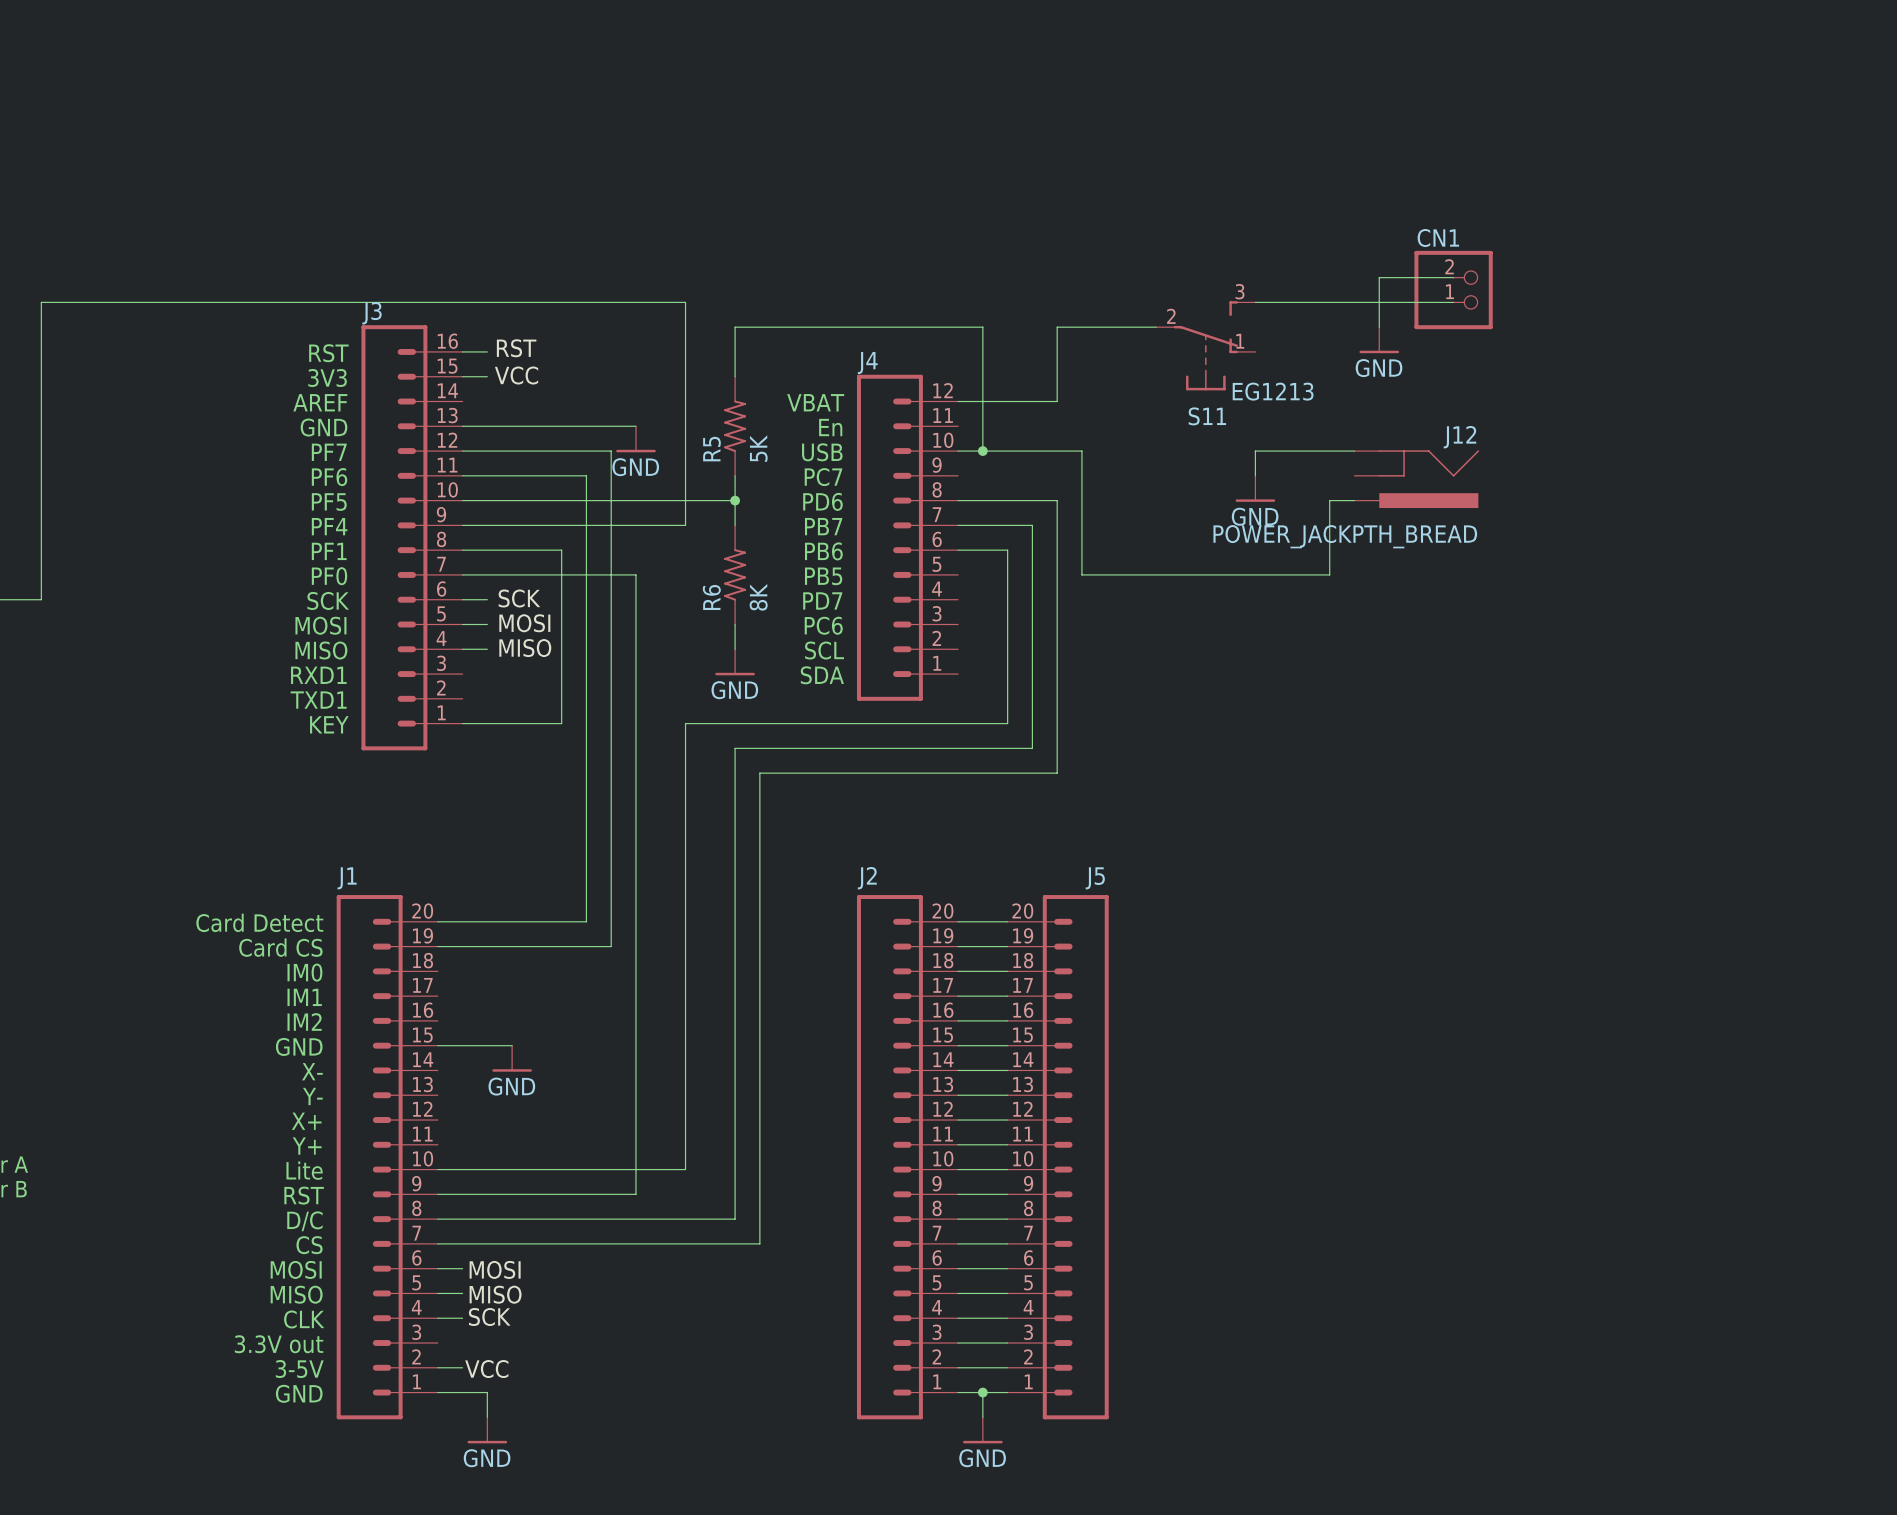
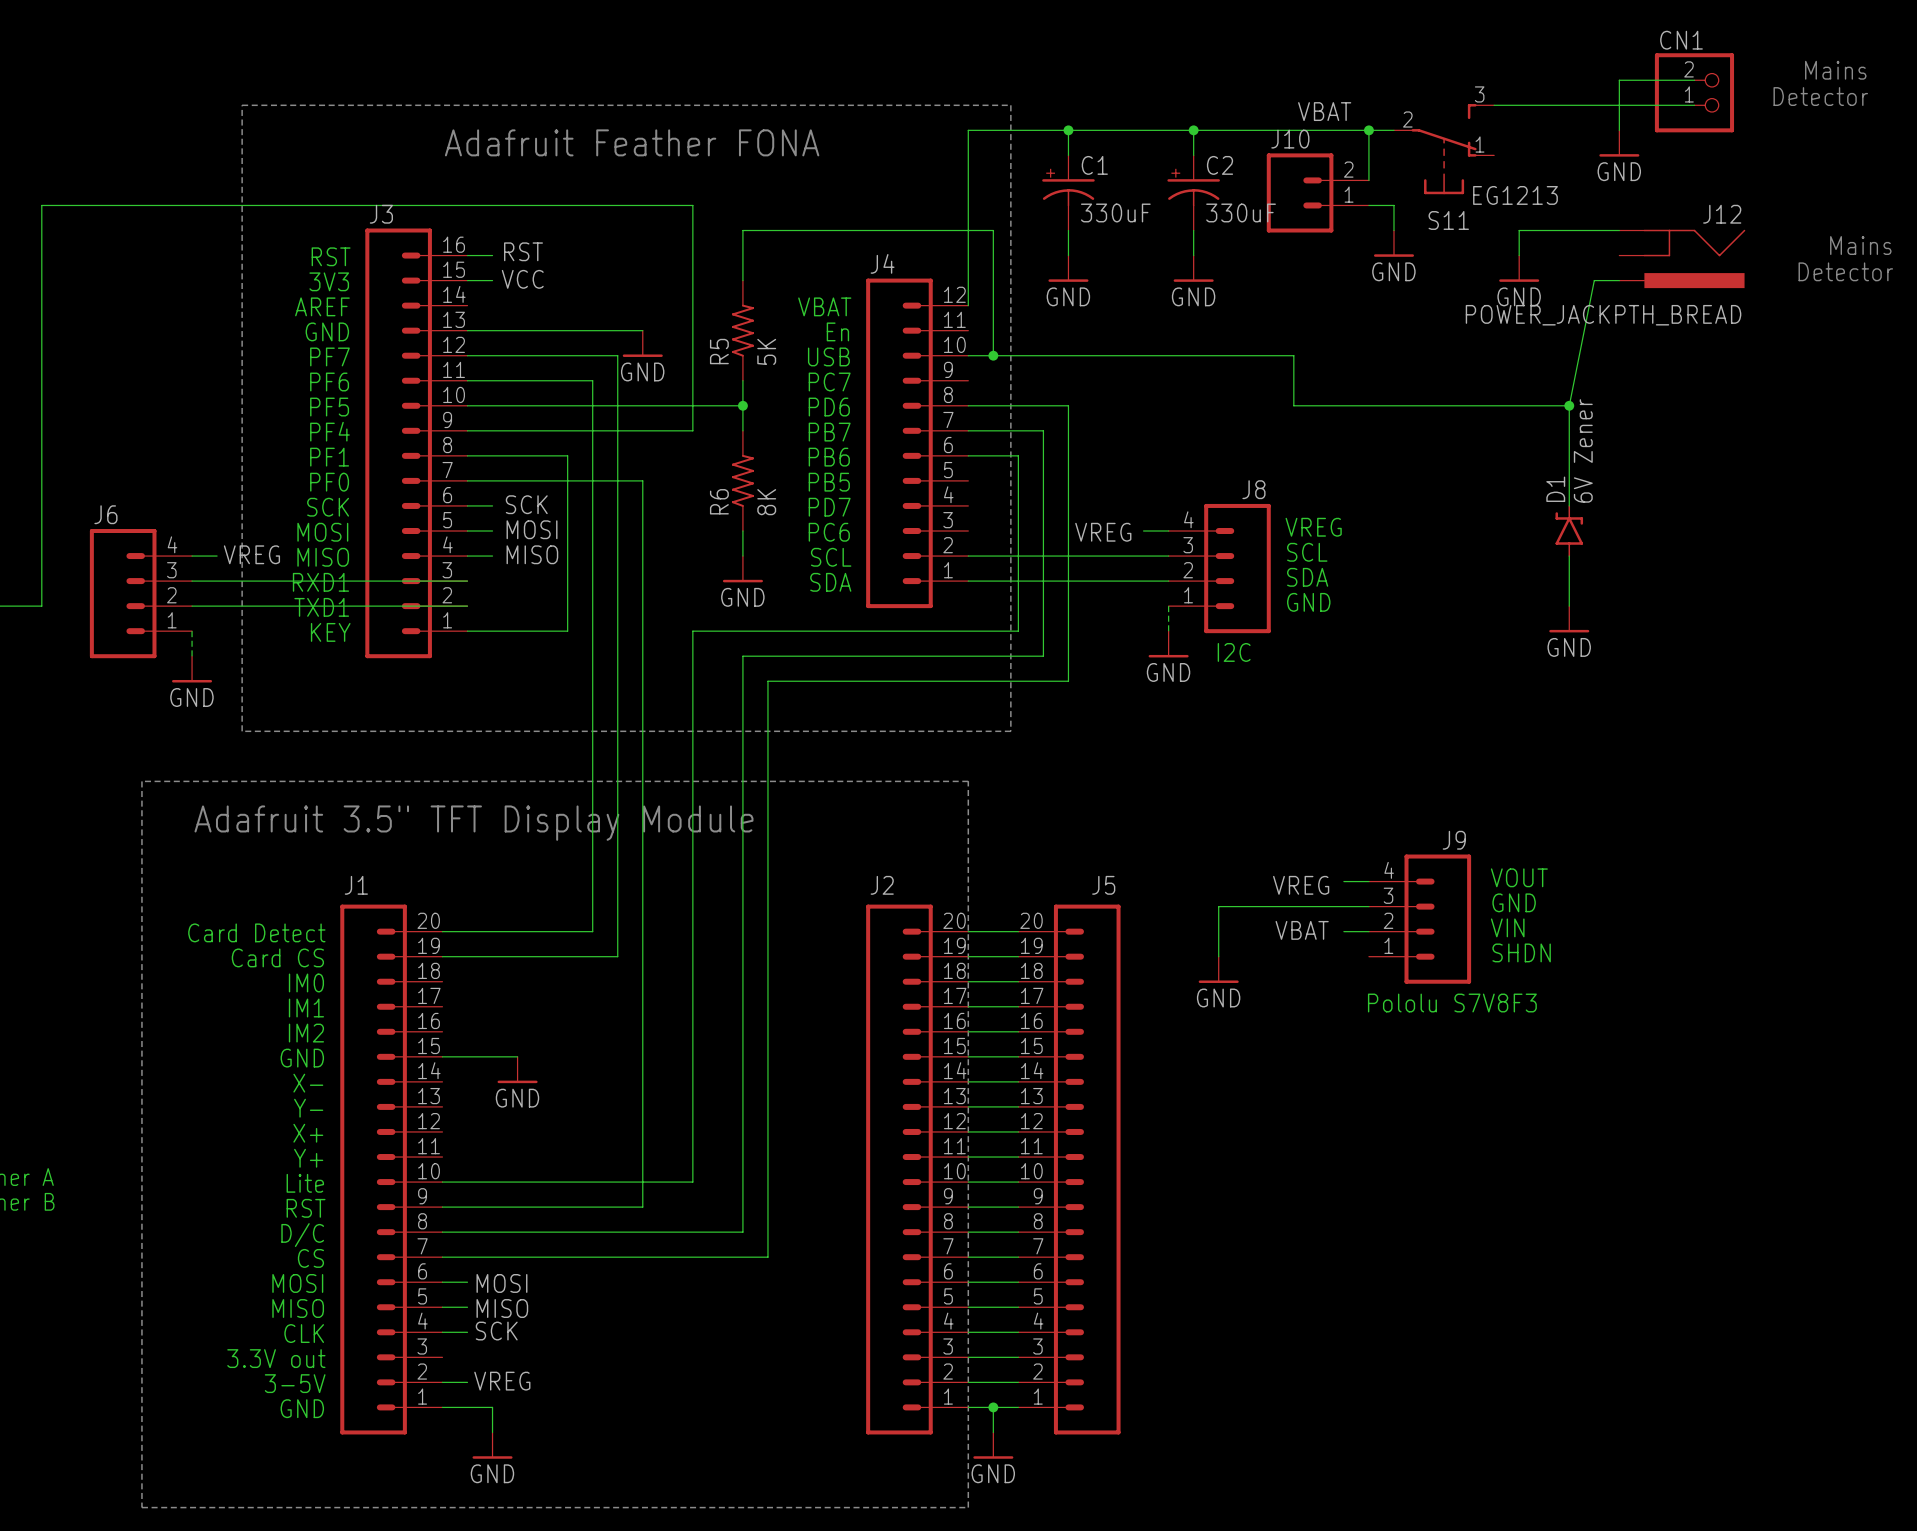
text: none -> Mains (1835, 70)
wire: none -> (1694, 80) (1619, 80) (1619, 130)
text: none -> Detector (1820, 96)
line: none -> (242, 105) (1010, 105) (1010, 731) (242, 731) (242, 105)
wire: none -> (1494, 105) (1694, 105)
label: none -> VBAT (1324, 111)
wire: none -> (1068, 130) (1068, 155)
junction: none -> (1068, 130)
wire: none -> (1193, 130) (1193, 155)
junction: none -> (1193, 130)
wire: none -> (1368, 130) (1368, 180)
junction: none -> (1368, 130)
wire: none -> (1393, 130) (968, 130) (968, 305)
text: none -> Adafruit Feather FONA (632, 142)
power symbol: none -> GND (1619, 143)
C1: none -> 330uF (1068, 192)
C2: none -> 330uF (1193, 192)
J10: none -> (1317, 192)
wire: none -> (1368, 205) (1393, 205) (1393, 230)
wire: none -> (1068, 230) (1068, 255)
wire: none -> (1193, 230) (1193, 255)
wire: none -> (1619, 230) (1519, 230) (1519, 255)
power symbol: none -> GND (1393, 243)
text: none -> Mains (1860, 245)
wire: none -> (467, 255) (492, 255)
text: none -> RST (331, 256)
power symbol: none -> GND (1068, 268)
power symbol: none -> GND (1193, 268)
power symbol: none -> GND (1519, 268)
text: none -> Detector (1845, 271)
wire: none -> (467, 280) (492, 280)
wire: (1453, 277) (1379, 277) (1379, 327) -> none
wire: none -> (1619, 280) (1594, 280) (1569, 405)
text: none -> 3V3 (329, 281)
CN1 position: (1453, 290) -> (1694, 92)
wire: (41, 302) (685, 302) -> (41, 305) (41, 205) (692, 205) (692, 305)
wire: (1255, 302) (1453, 302) -> none
text: none -> AREF (322, 306)
text: none -> VBAT (824, 306)
wire: none -> (467, 330) (642, 330)
wire: (982, 327) (735, 327) (735, 376) -> (993, 330) (993, 230) (742, 230) (742, 280)
wire: (1156, 327) (1057, 327) (1057, 401) -> none
text: none -> GND (327, 331)
text: none -> En (837, 331)
power symbol: none -> GND (642, 343)
power symbol: GND (1379, 340) -> none
S11 position: (1205, 345) -> (1444, 149)
label position: RST (516, 348) -> RST (523, 251)
wire: none -> (492, 355) (617, 355) (617, 455)
wire: none -> (968, 355) (1293, 355) (1293, 405) (1569, 405)
wire: (982, 351) (982, 451) -> none
junction: none -> (993, 355)
text: RST (328, 353) -> PF7 (329, 356)
text: none -> USB (828, 356)
label position: VCC (516, 375) -> VCC (522, 279)
text: 3V3 (327, 377) -> PF6 (329, 382)
text: none -> PC7 (829, 382)
wire: none -> (467, 405) (742, 405)
junction: none -> (742, 405)
wire: none -> (1569, 405) (1569, 505)
junction: none -> (1569, 405)
text: AREF (320, 402) -> PF5 (329, 407)
text: VBAT (815, 402) -> PD6 (829, 407)
wire: (685, 426) (685, 525) (487, 525) -> (692, 430) (642, 430)
R5 position: (735, 426) -> (742, 330)
text: GND (324, 427) -> PF4 (329, 431)
text: En (830, 427) -> PB7 (829, 432)
power symbol: GND (635, 439) -> none
wire: (561, 451) (611, 451) -> (567, 455) (567, 556)
junction: (982, 451) -> none
wire: (1007, 451) (1081, 451) (1081, 574) -> (1018, 455) (1018, 556) (1168, 556)
wire: (1354, 451) (1255, 451) (1255, 475) -> none
text: PF7 (329, 452) -> PF1 (329, 457)
text: USB (822, 452) -> PB6 (829, 457)
text: PF6 (329, 477) -> PF0 (329, 482)
text: PC7 (823, 477) -> PB5 (829, 482)
J12 position: (1416, 479) -> (1682, 258)
power symbol: GND (1255, 488) -> none
wire: (487, 500) (735, 500) -> none
junction: (735, 500) -> none
wire: (958, 500) (1057, 500) -> (1068, 405) (1068, 505)
wire: (1354, 500) (1329, 500) (1329, 574) (1156, 574) -> none
text: PD6 (822, 501) -> PD7 (829, 507)
text: PF5 (329, 502) -> SCK (328, 507)
text: none -> VREG (1313, 527)
wire: (958, 525) (1032, 525) -> (968, 430) (1043, 430) (1043, 530)
wire: none -> (1143, 530) (1168, 530)
D1: none -> 6V Zener (1569, 530)
text: PF4 (329, 526) -> MOSI (322, 532)
text: PB7 (823, 526) -> PC6 (829, 532)
label: none -> VREG (1103, 532)
J3 position: (412, 537) -> (416, 443)
J4 position: (907, 537) -> (917, 443)
text: none -> SCL (1307, 552)
label: none -> VREG (251, 554)
wire: none -> (192, 556) (217, 556)
wire: (487, 550) (561, 550) -> none
wire: none -> (1569, 556) (1569, 606)
text: PF1 (329, 551) -> MISO (323, 557)
text: PB6 (823, 551) -> SCL (831, 557)
J8: none -> (1219, 568)
power symbol: none -> GND (742, 569)
text: none -> SDA (1307, 577)
wire: none -> (192, 581) (467, 581)
wire: (462, 574) (635, 574) -> (492, 380) (592, 380) (592, 480) (642, 480) (642, 581)
R6 position: (735, 574) -> (742, 480)
wire: none -> (968, 581) (1093, 581)
text: PF0 (329, 576) -> RXD1 (320, 582)
text: PB5 (823, 576) -> SDA (830, 582)
J6: none -> (140, 593)
text: none -> GND (1308, 602)
label position: SCK (519, 598) -> SCK (526, 504)
wire: (462, 599) (487, 599) -> (467, 606) (192, 606)
wire: none -> (1168, 606) (1168, 631)
text: SCK (328, 600) -> TXD1 (321, 607)
text: PD7 (822, 600) -> none
power symbol: none -> GND (1569, 619)
label position: MOSI (524, 623) -> MOSI (532, 529)
wire: none -> (192, 631) (192, 656)
wire: (561, 624) (561, 723) (462, 723) -> (567, 631) (492, 631)
wire: (735, 624) (735, 649) -> none
wire: (1007, 624) (1007, 723) (685, 723) -> (1018, 631) (692, 631) (692, 731)
text: MOSI (320, 625) -> KEY (330, 632)
text: PC6 (823, 625) -> none
power symbol: none -> GND (1168, 644)
text: none -> I2C (1234, 652)
label position: MISO (525, 648) -> MISO (532, 554)
wire: (462, 649) (487, 649) -> none
wire: (1032, 649) (1032, 748) (735, 748) -> (1043, 656) (742, 656) (742, 756)
text: MISO (321, 650) -> none
text: SCL (824, 650) -> none
power symbol: none -> GND (192, 669)
power symbol: GND (735, 662) -> none
wire: (1057, 674) (1057, 773) (759, 773) -> (1068, 681) (767, 681) (767, 781)
text: RXD1 (318, 675) -> none
text: SDA (822, 675) -> none
text: TXD1 (318, 700) -> none
text: KEY (329, 724) -> none
line: none -> (141, 781) (141, 1507) (968, 1507) (968, 781) (141, 781)
text: none -> Adafruit 3.5" TFT Display Module (473, 823)
text: none -> VOUT (1519, 877)
wire: none -> (1343, 881) (1368, 881)
label: none -> VREG (1301, 885)
text: none -> GND (1514, 902)
wire: none -> (1368, 906) (1218, 906) (1218, 956)
J9: none -> (1420, 919)
text: none -> VIN (1507, 927)
label: none -> VBAT (1302, 930)
wire: none -> (1343, 931) (1368, 931)
text: none -> SHDN (1521, 952)
power symbol: none -> GND (1218, 969)
text: none -> Pololu S7V8F3 (1452, 1003)
label: VCC (486, 1369) -> VREG (502, 1381)

